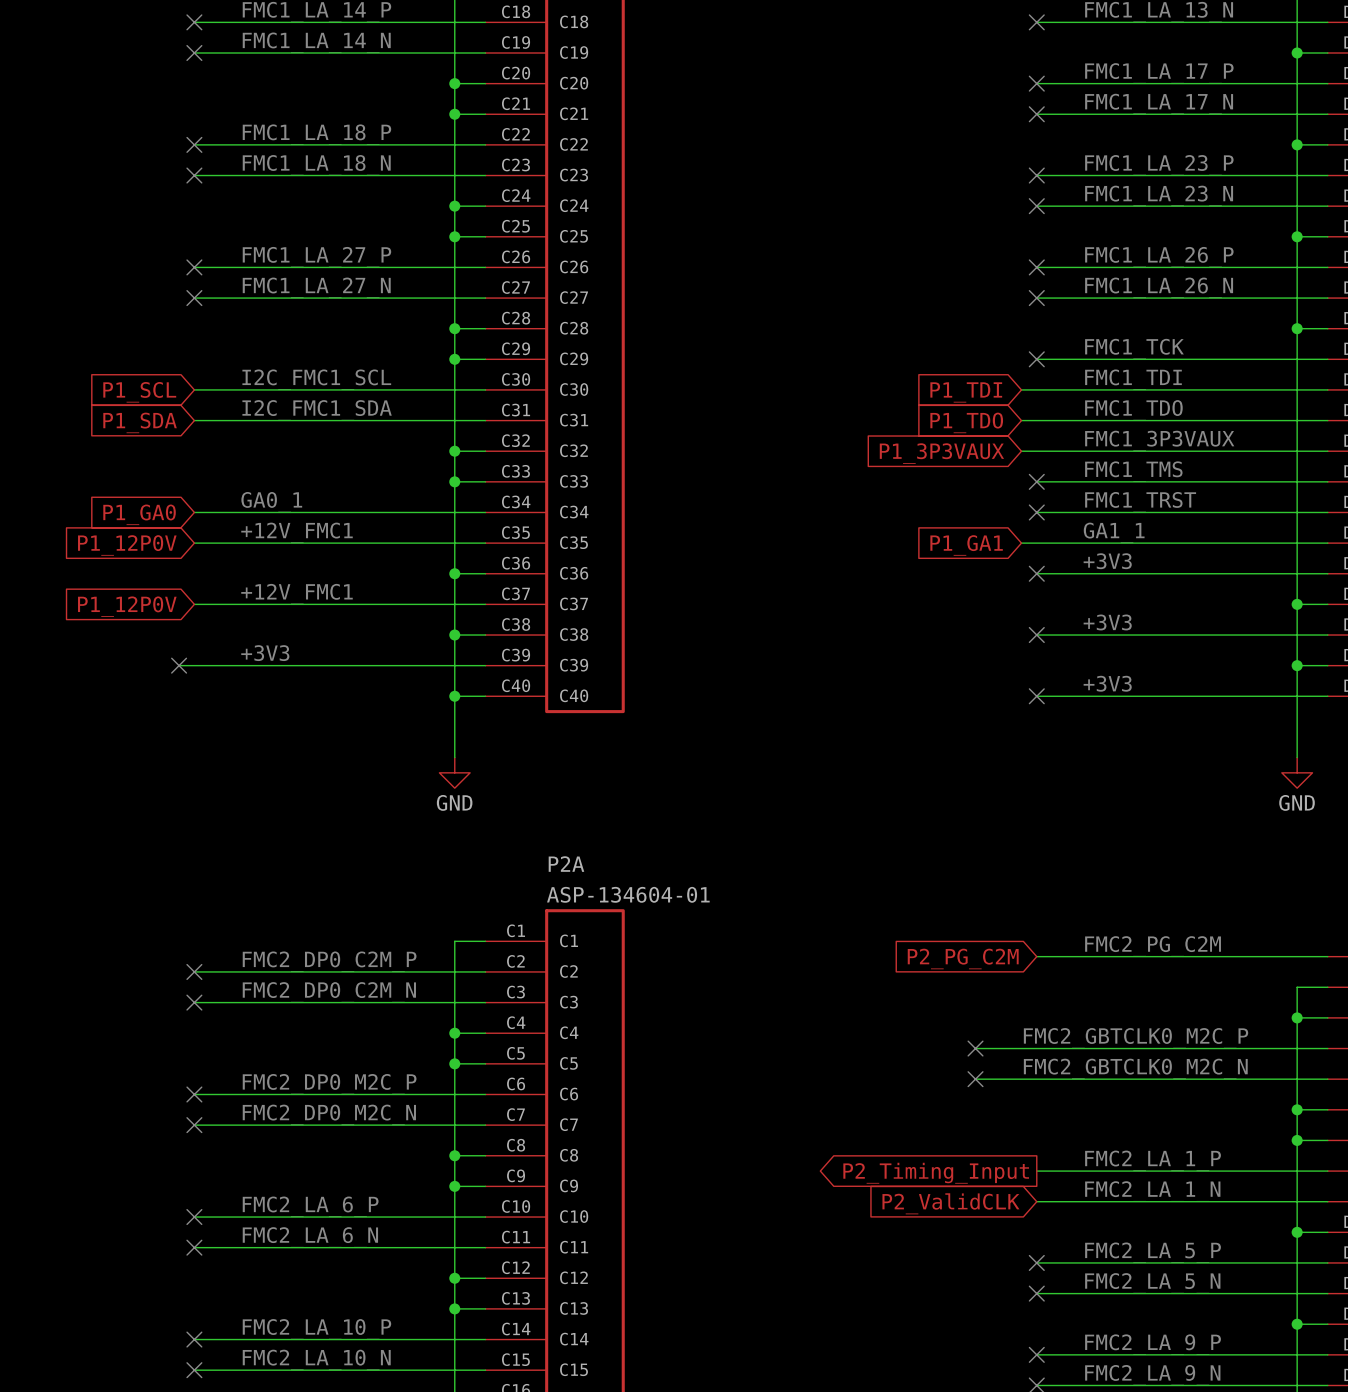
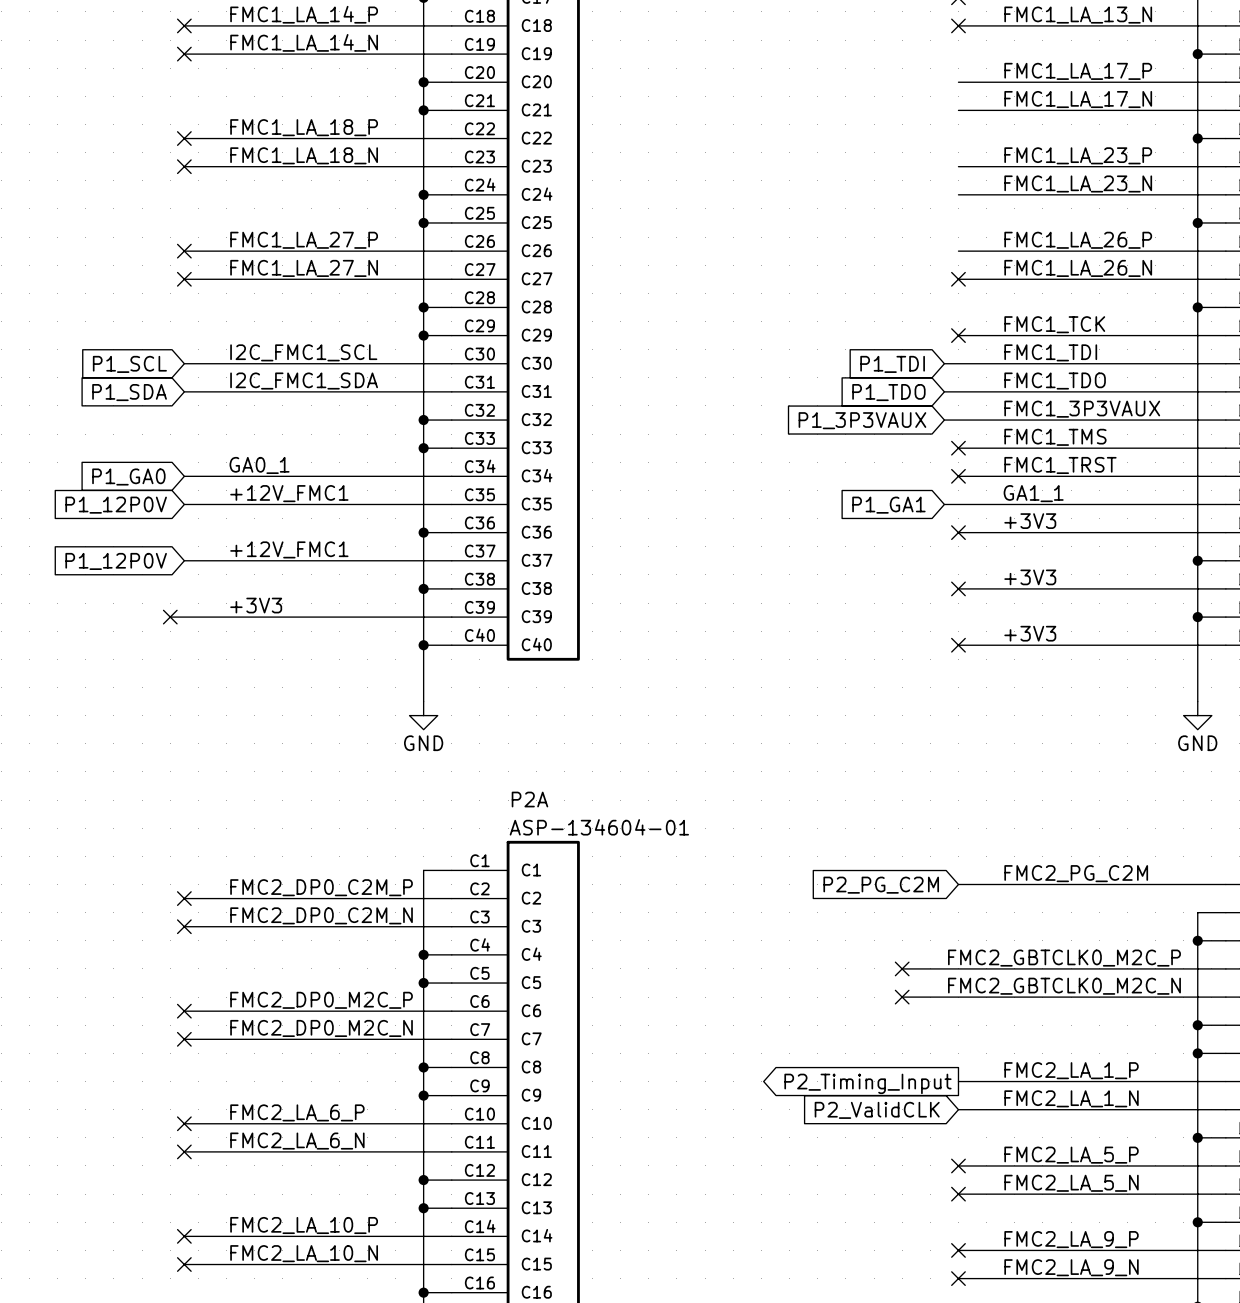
no-connect mark: (1036, 83) -> none
no-connect mark: (1036, 114) -> none
no-connect mark: (1036, 175) -> none
no-connect mark: (1036, 206) -> none
no-connect mark: (1036, 267) -> none

